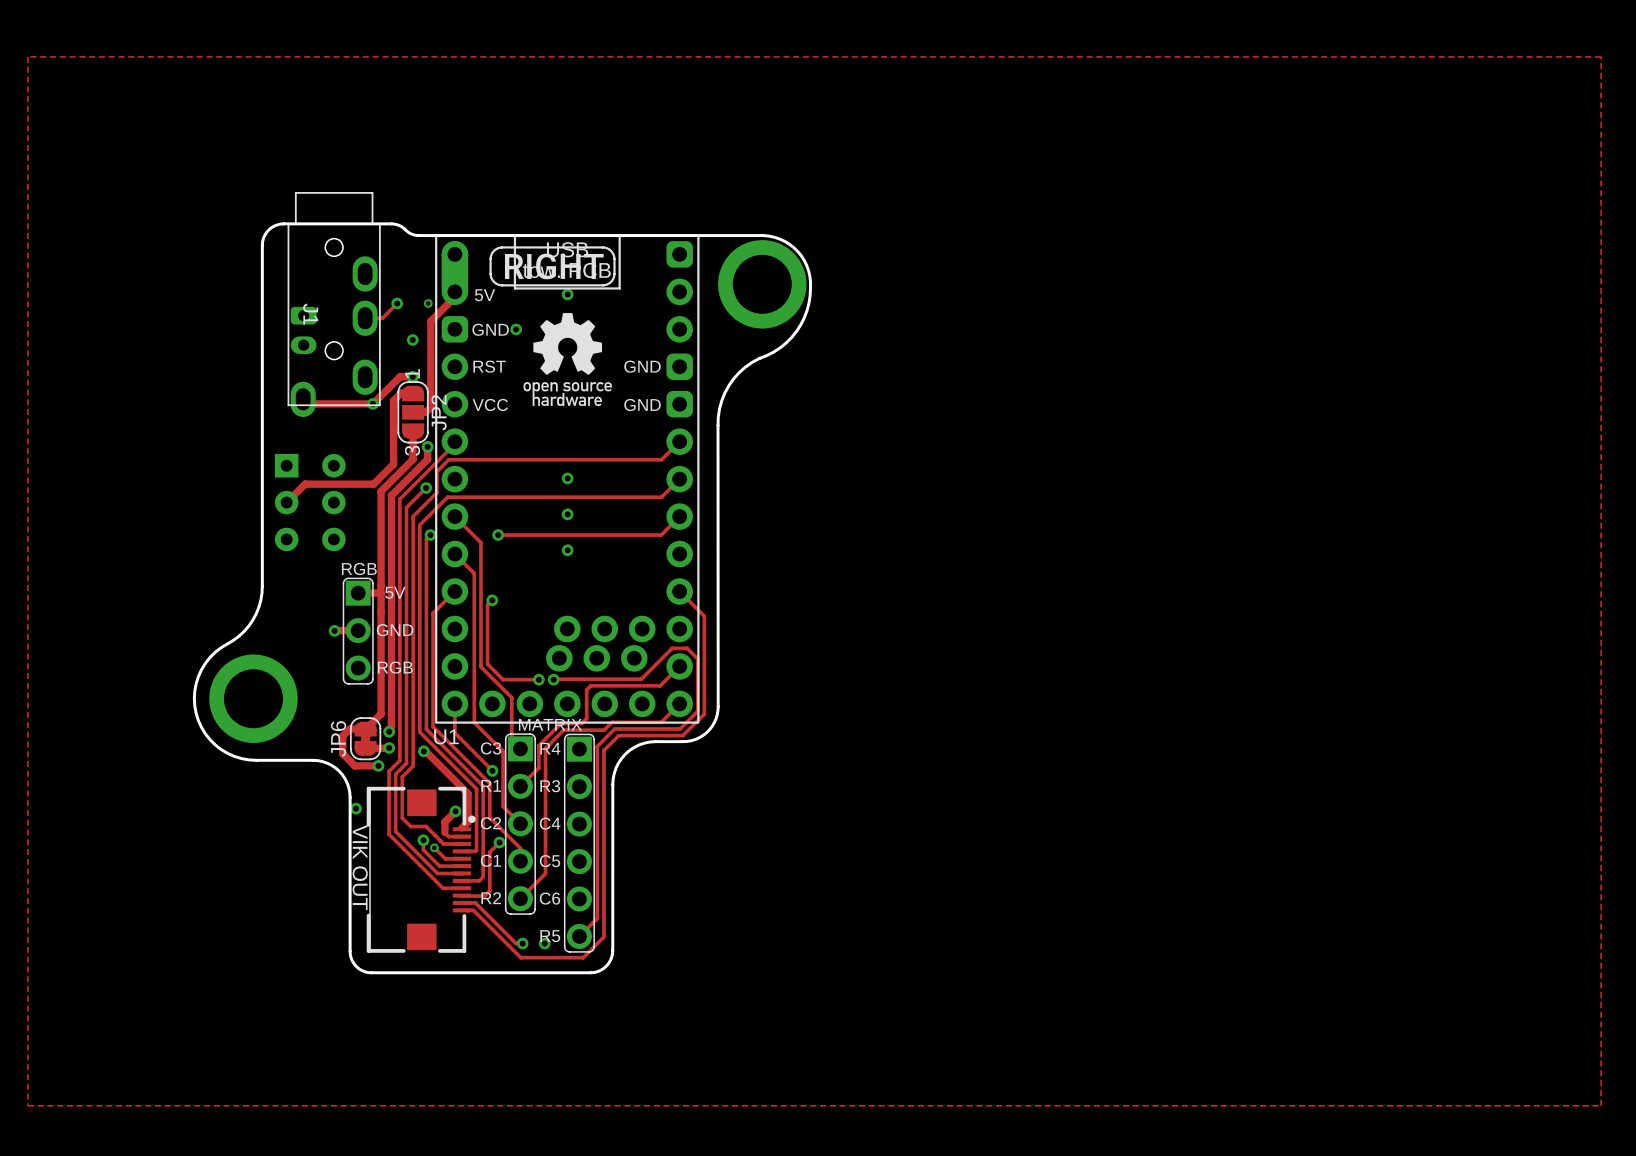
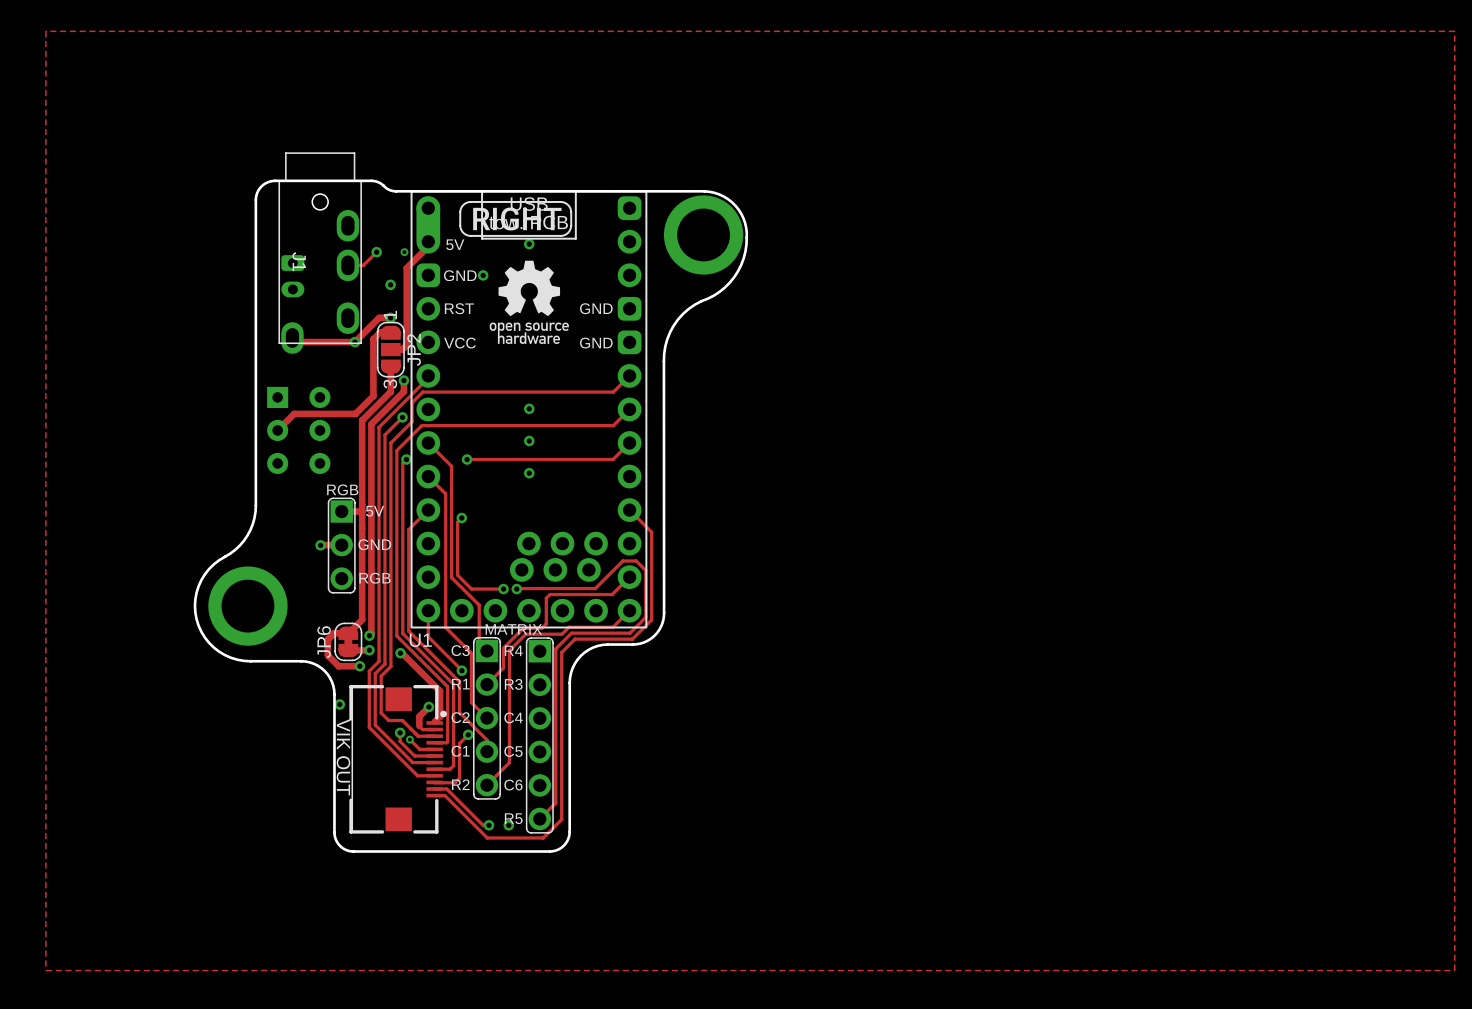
J1 footprint: [287, 192, 381, 418] -> [278, 152, 362, 354]

